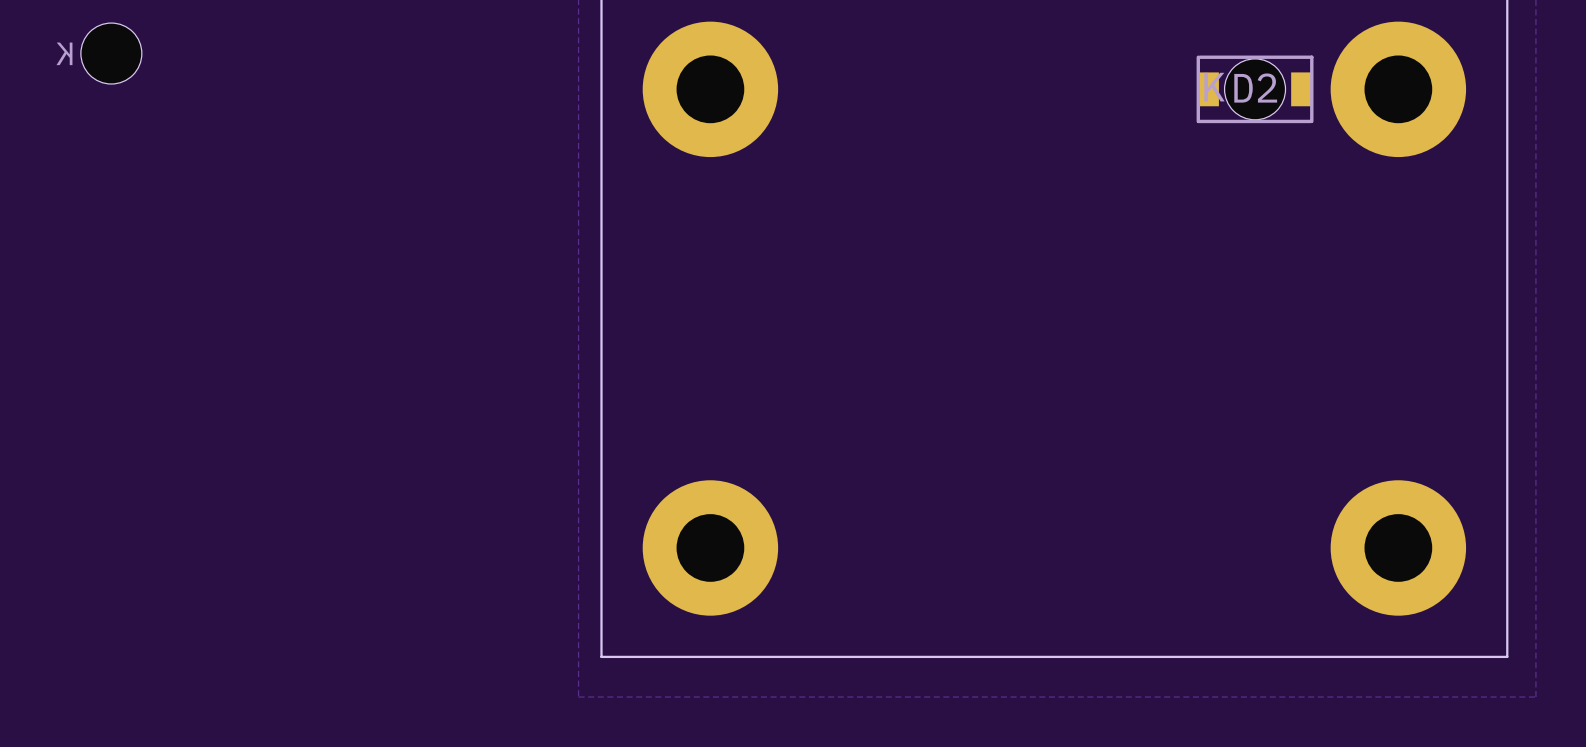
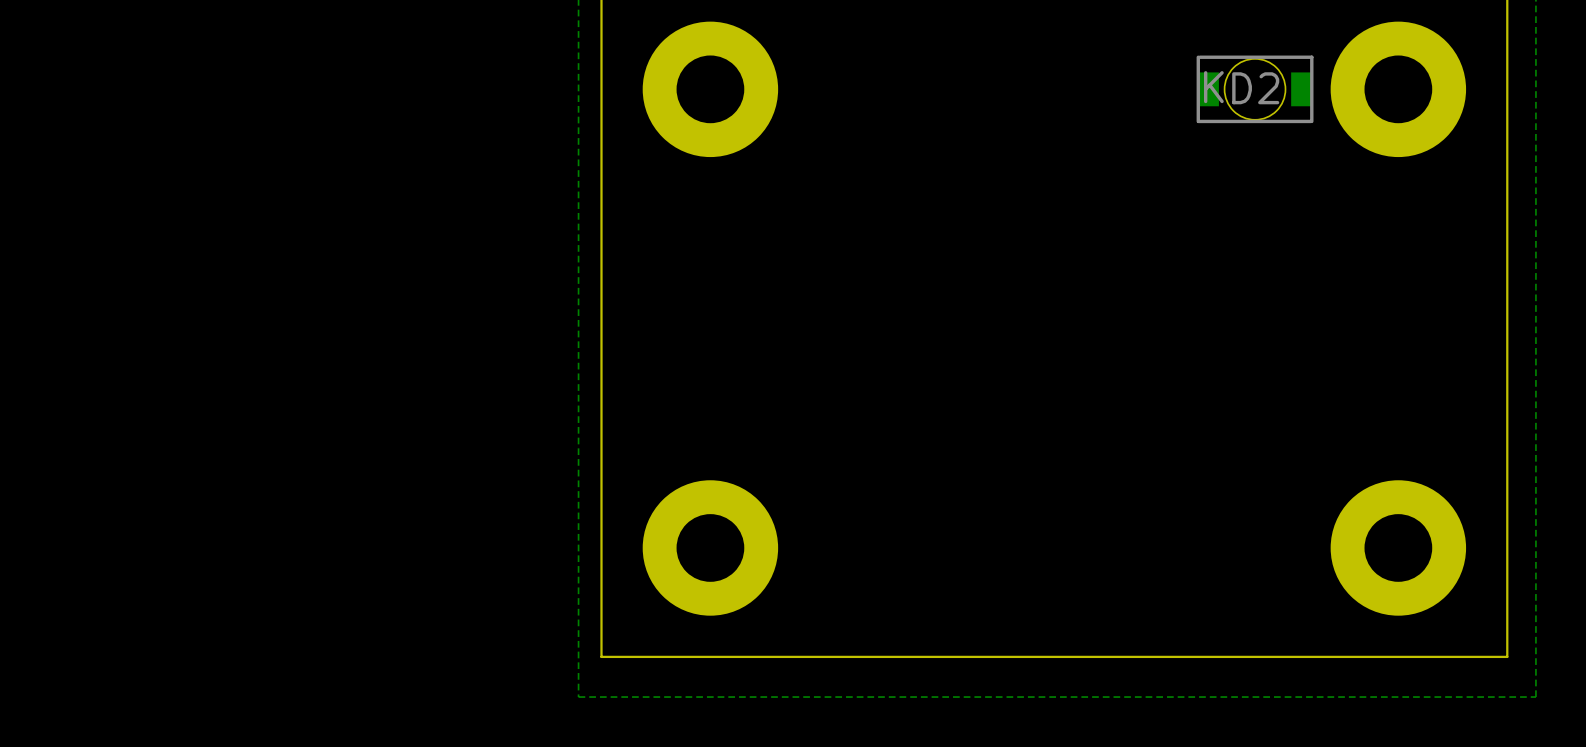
part: (111, 53) -> none

